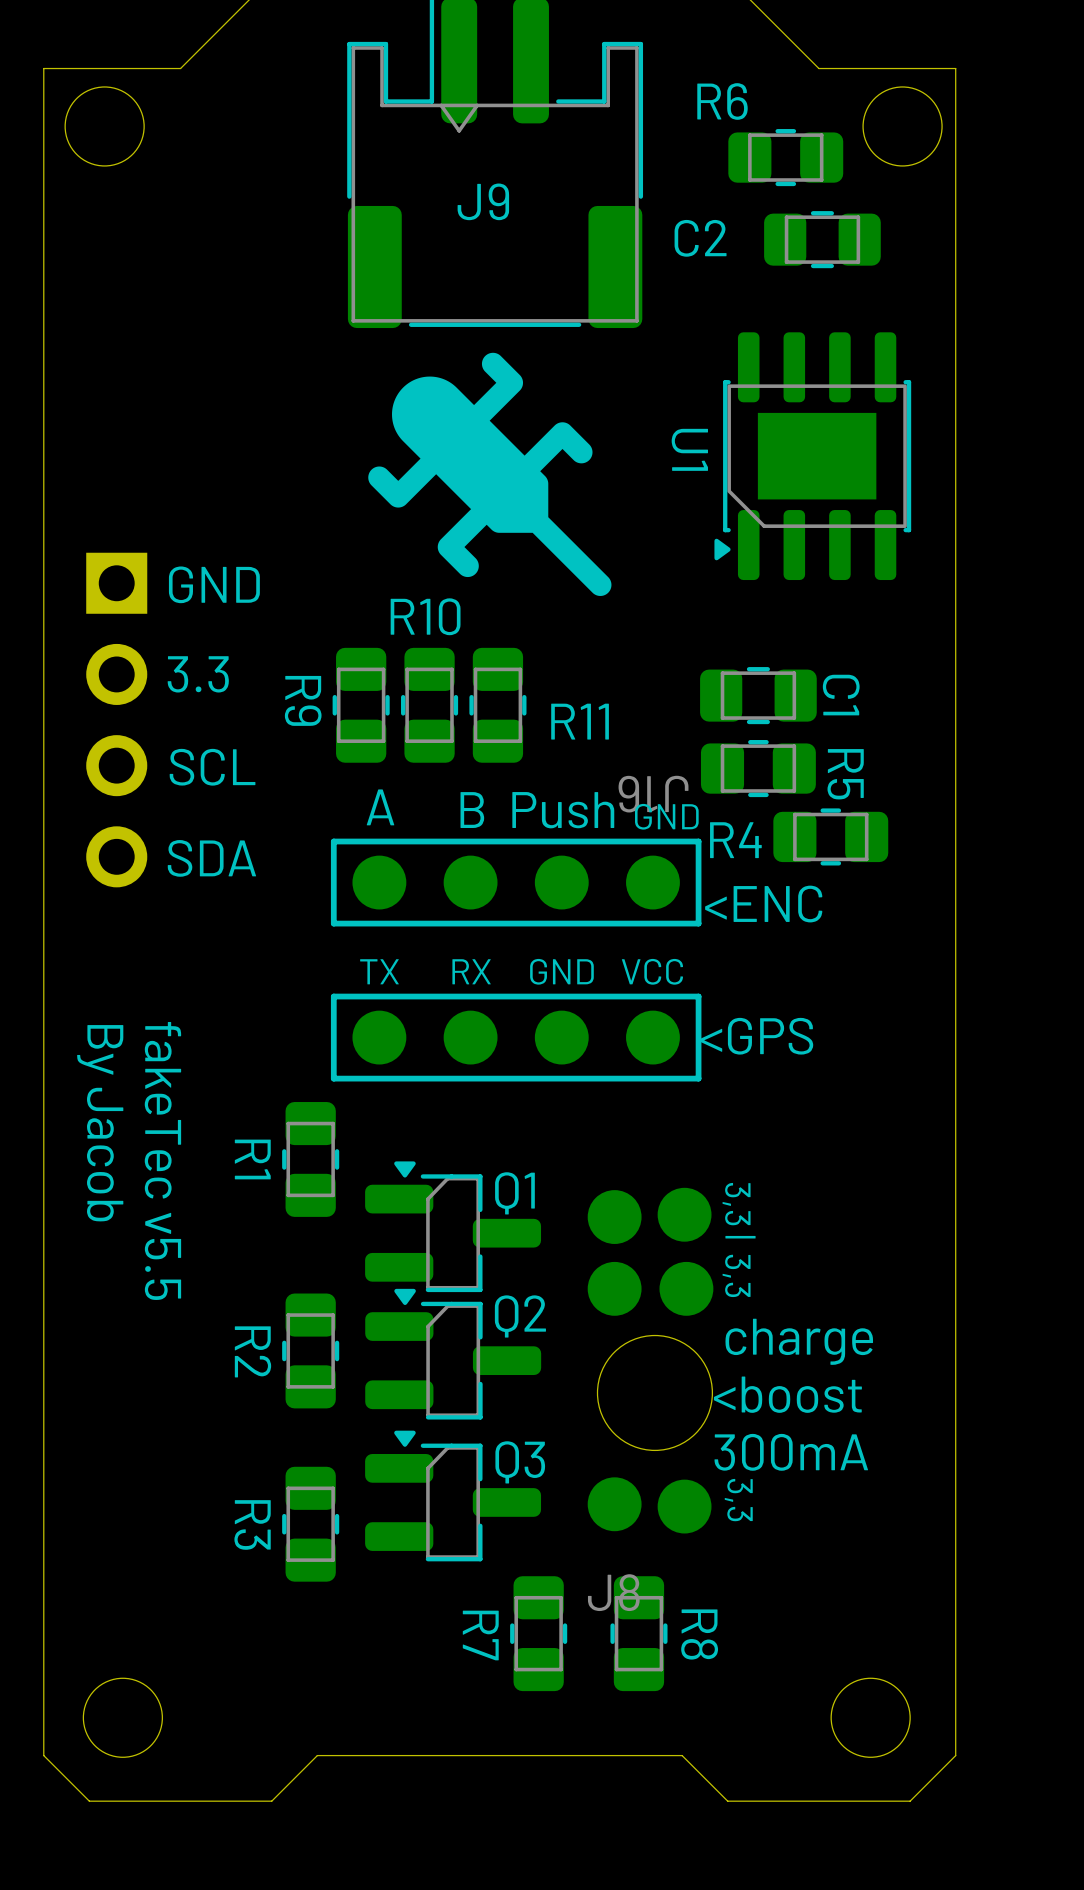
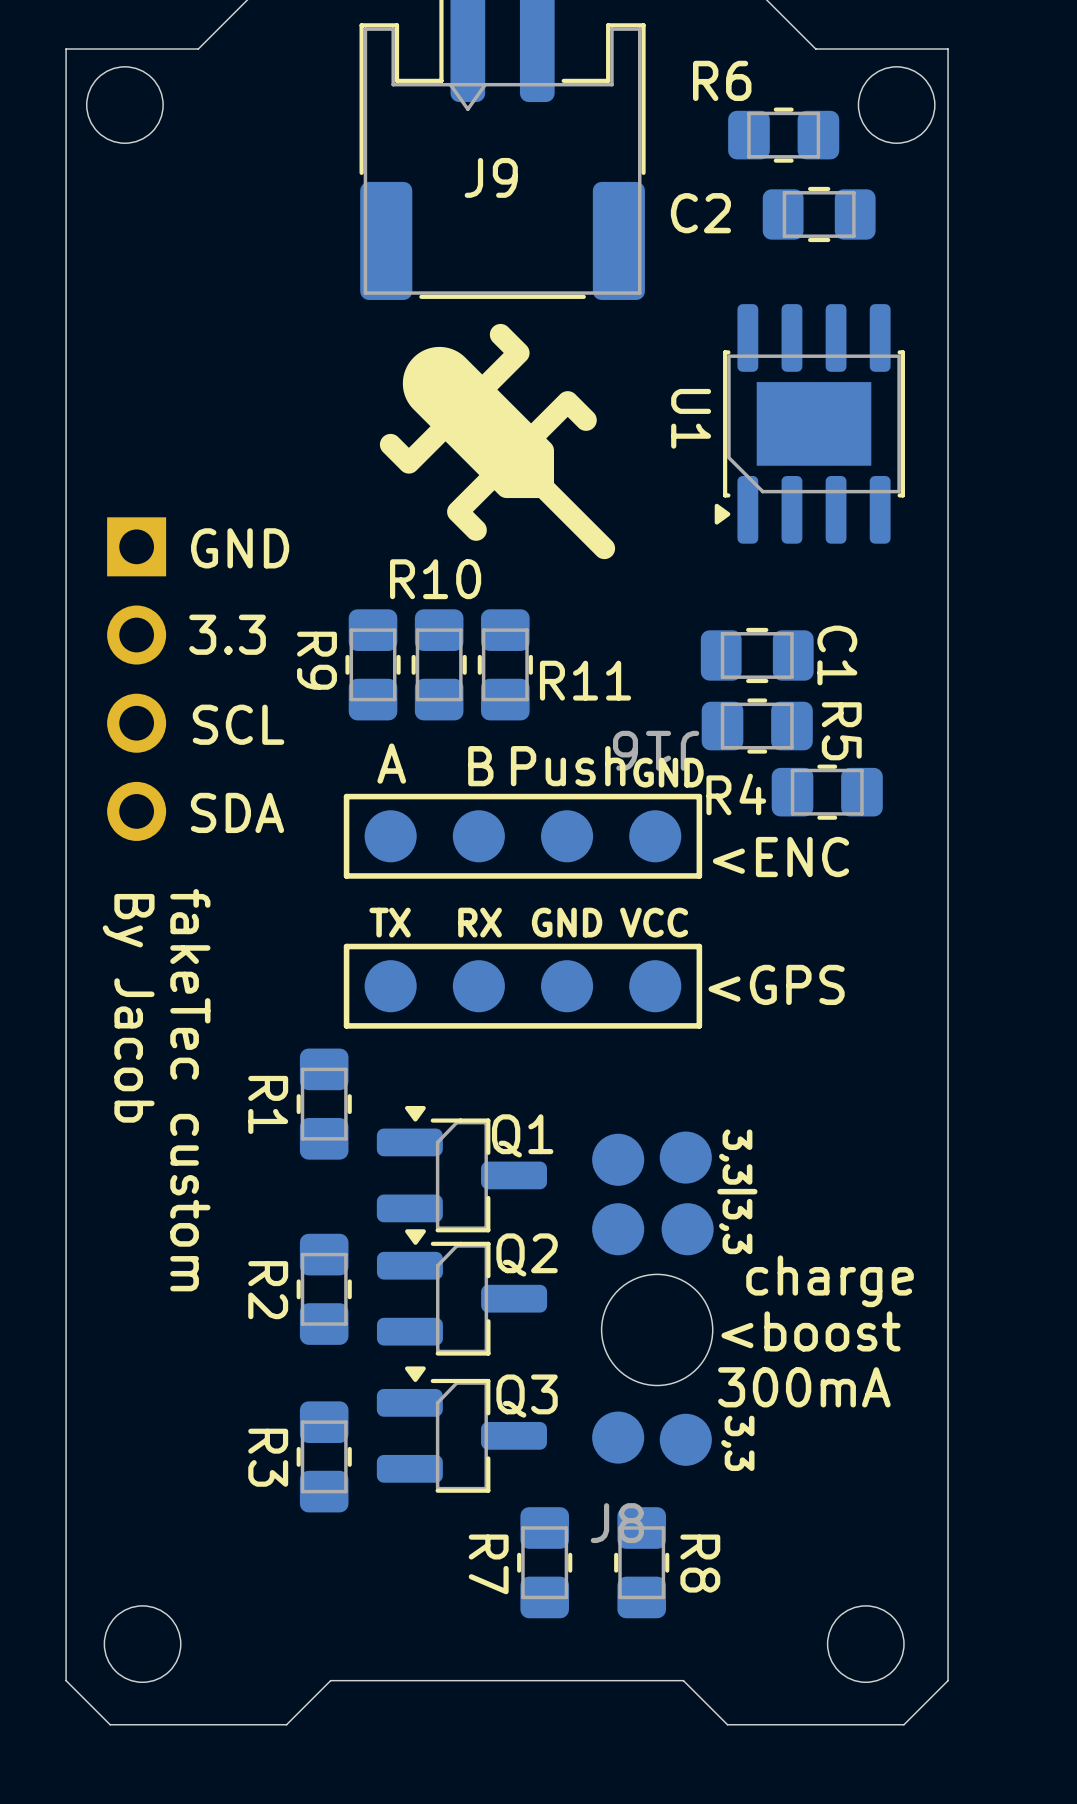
text position: By Jacob (100, 1123) -> By Jacob (128, 1008)
text: fakeTec v5.5 (162, 1160) -> fakeTec custom (190, 1090)

